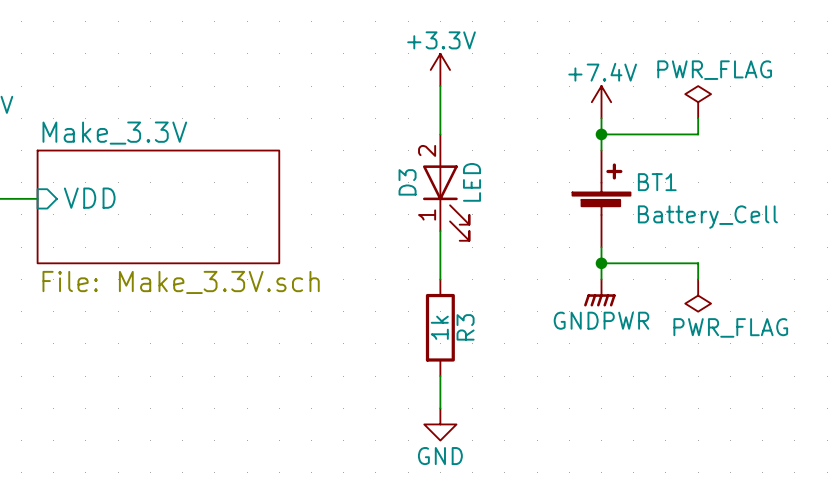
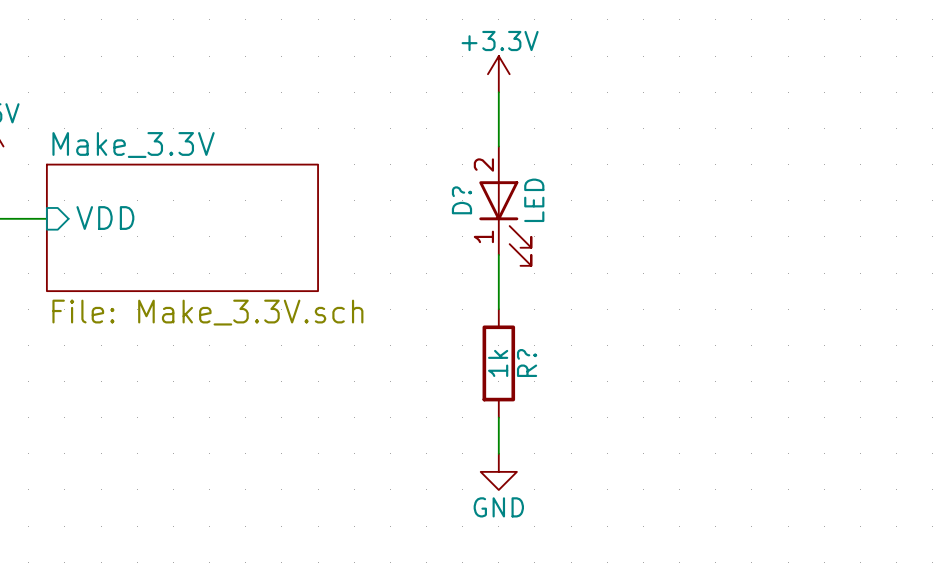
power symbol: +7.4V (601, 102) -> none
power symbol: PWR_FLAG (698, 102) -> none
wire: (601, 118) (601, 150) -> none
wire: (698, 118) (698, 134) (601, 134) -> none
junction: (601, 134) -> none
D3 name: D3 (407, 182) -> D? (461, 200)
BT1: Battery_Cell (601, 198) -> none
wire: (601, 247) (601, 279) -> none
wire: (601, 263) (698, 263) (698, 279) -> none
junction: (601, 263) -> none
power symbol: GNDPWR (599, 292) -> none
power symbol: PWR_FLAG (698, 295) -> none
R3 name: R3 (465, 327) -> R? (527, 363)

